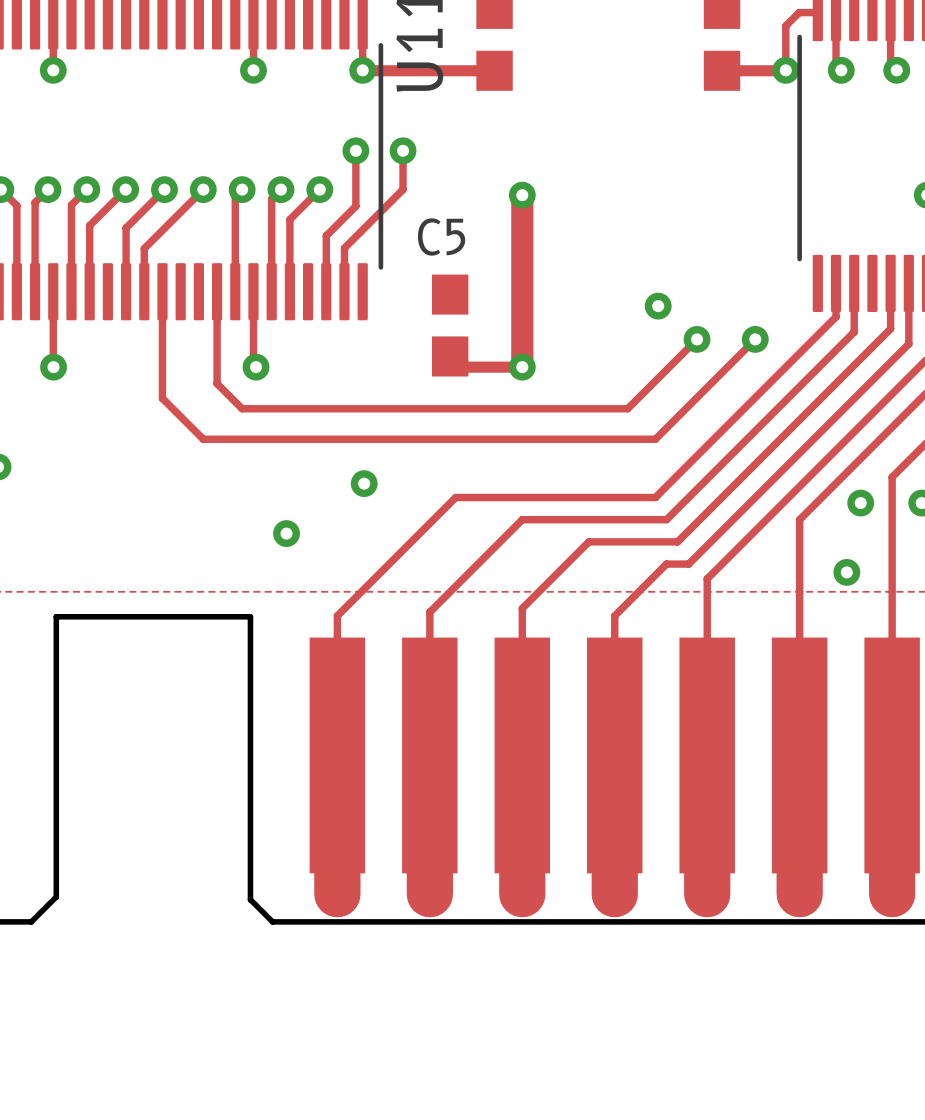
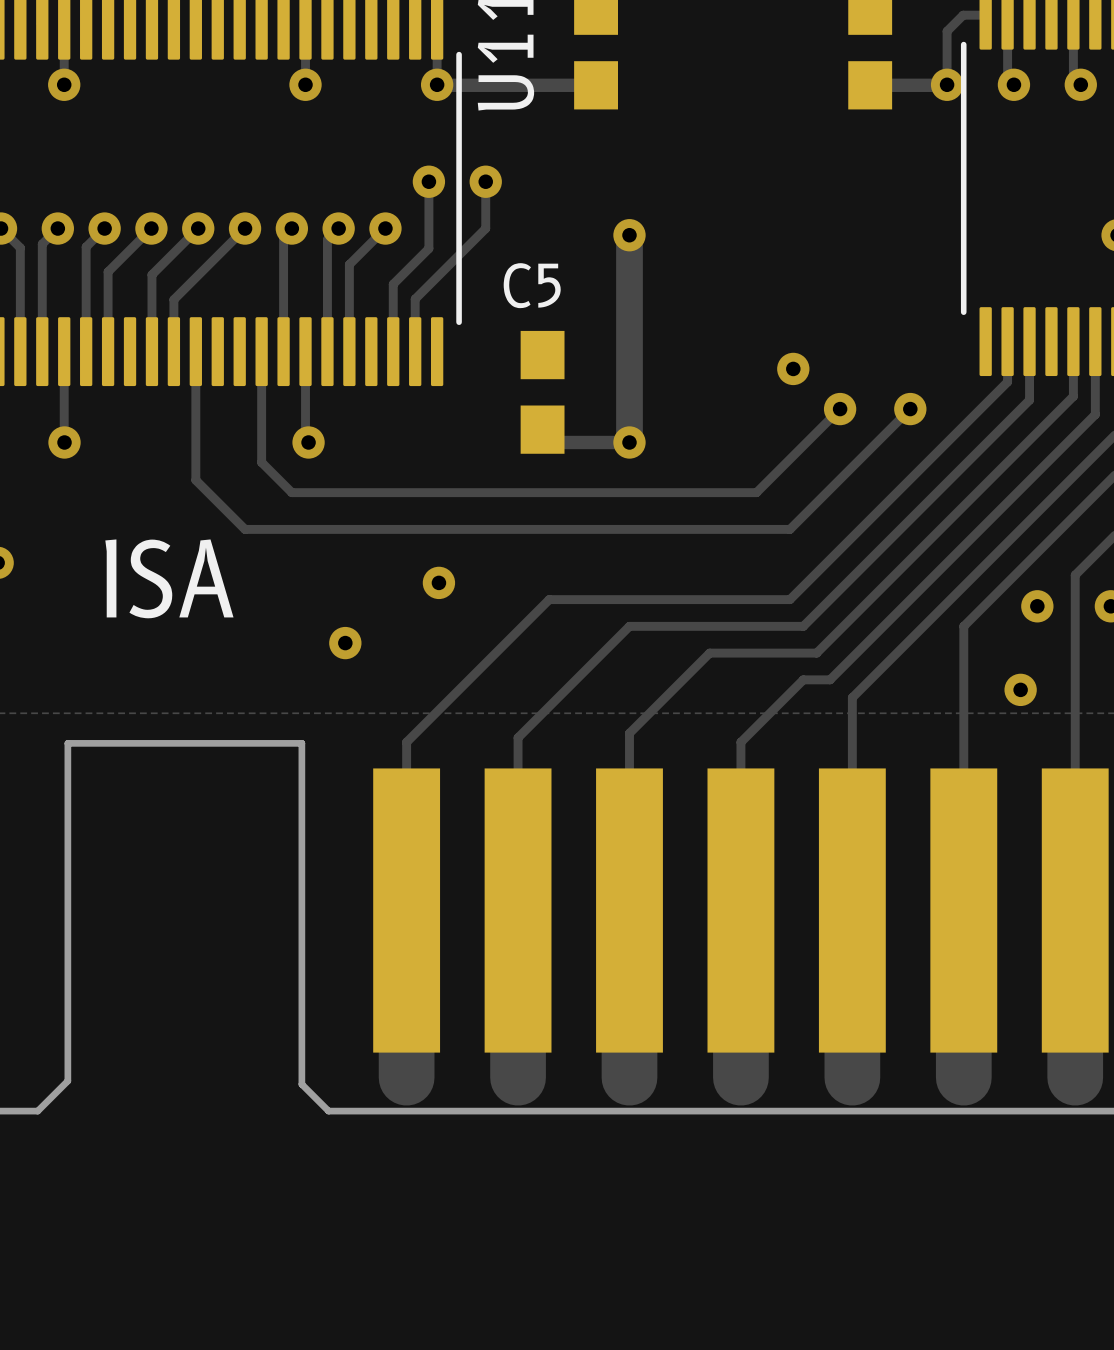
ISA name: none -> ISA (169, 578)

